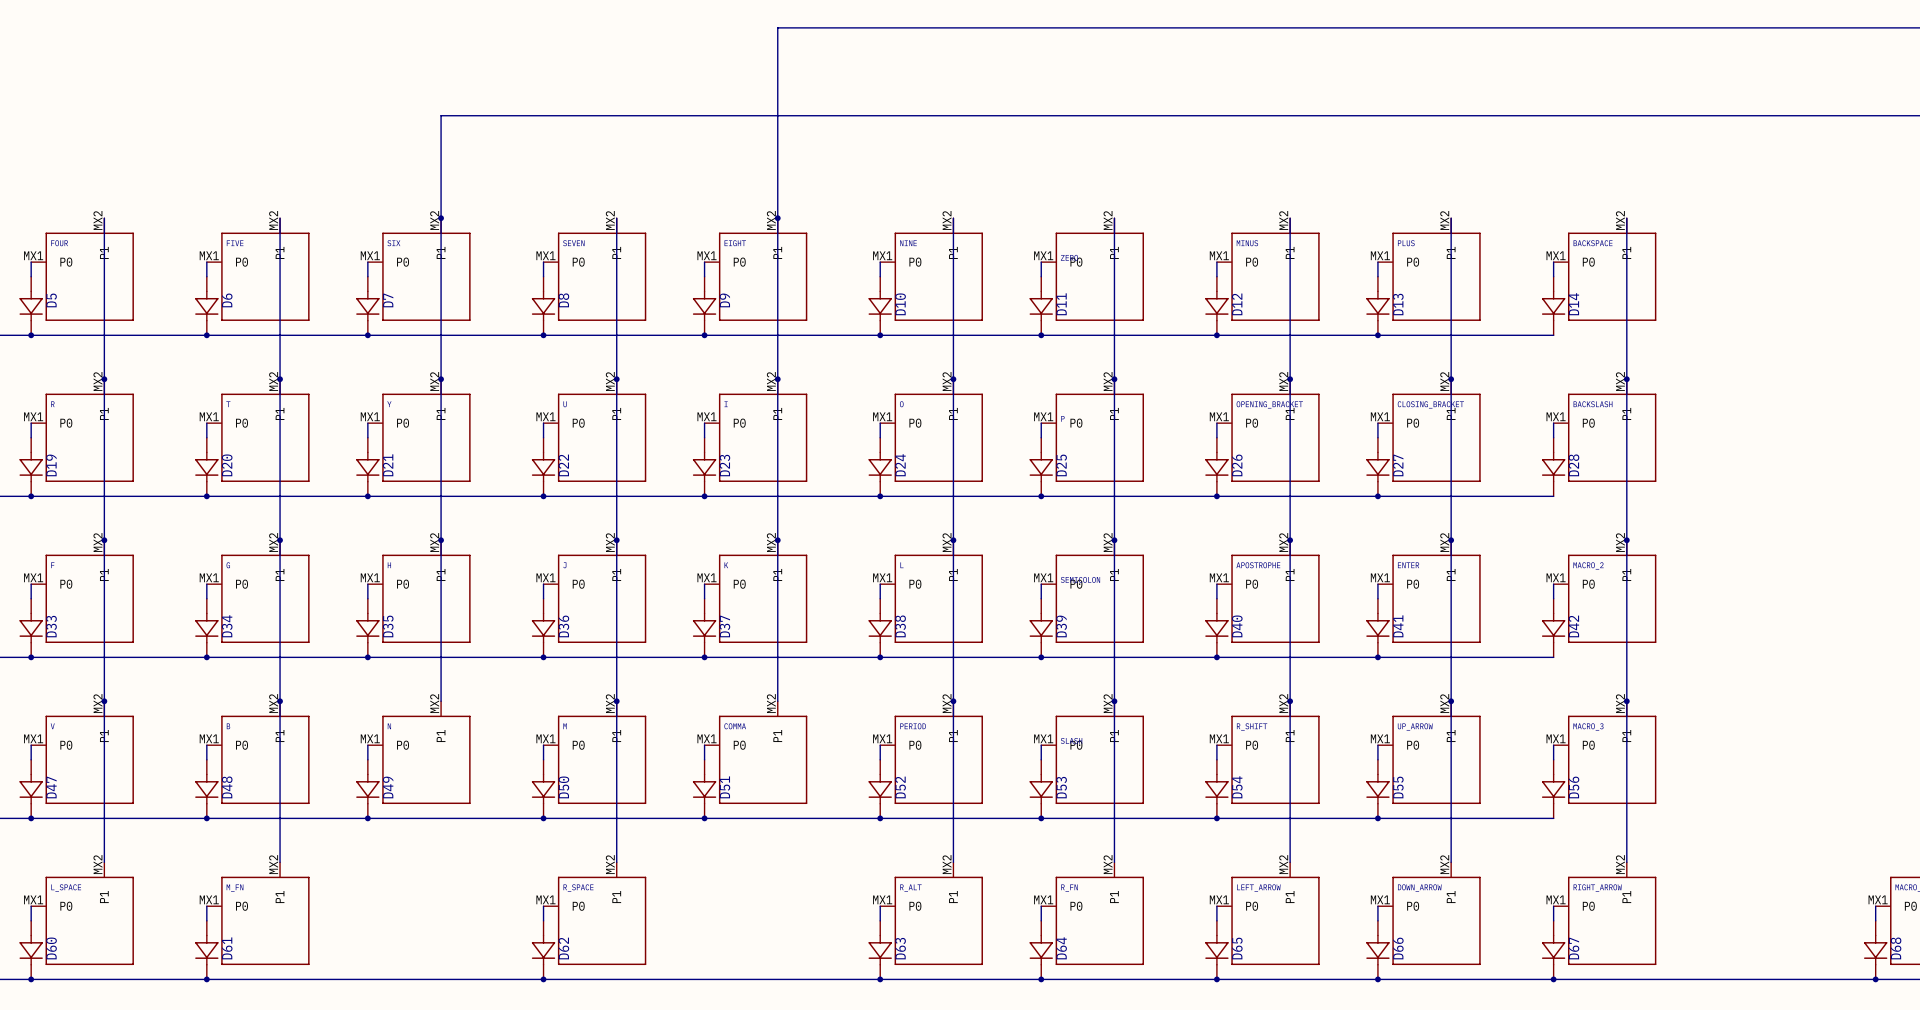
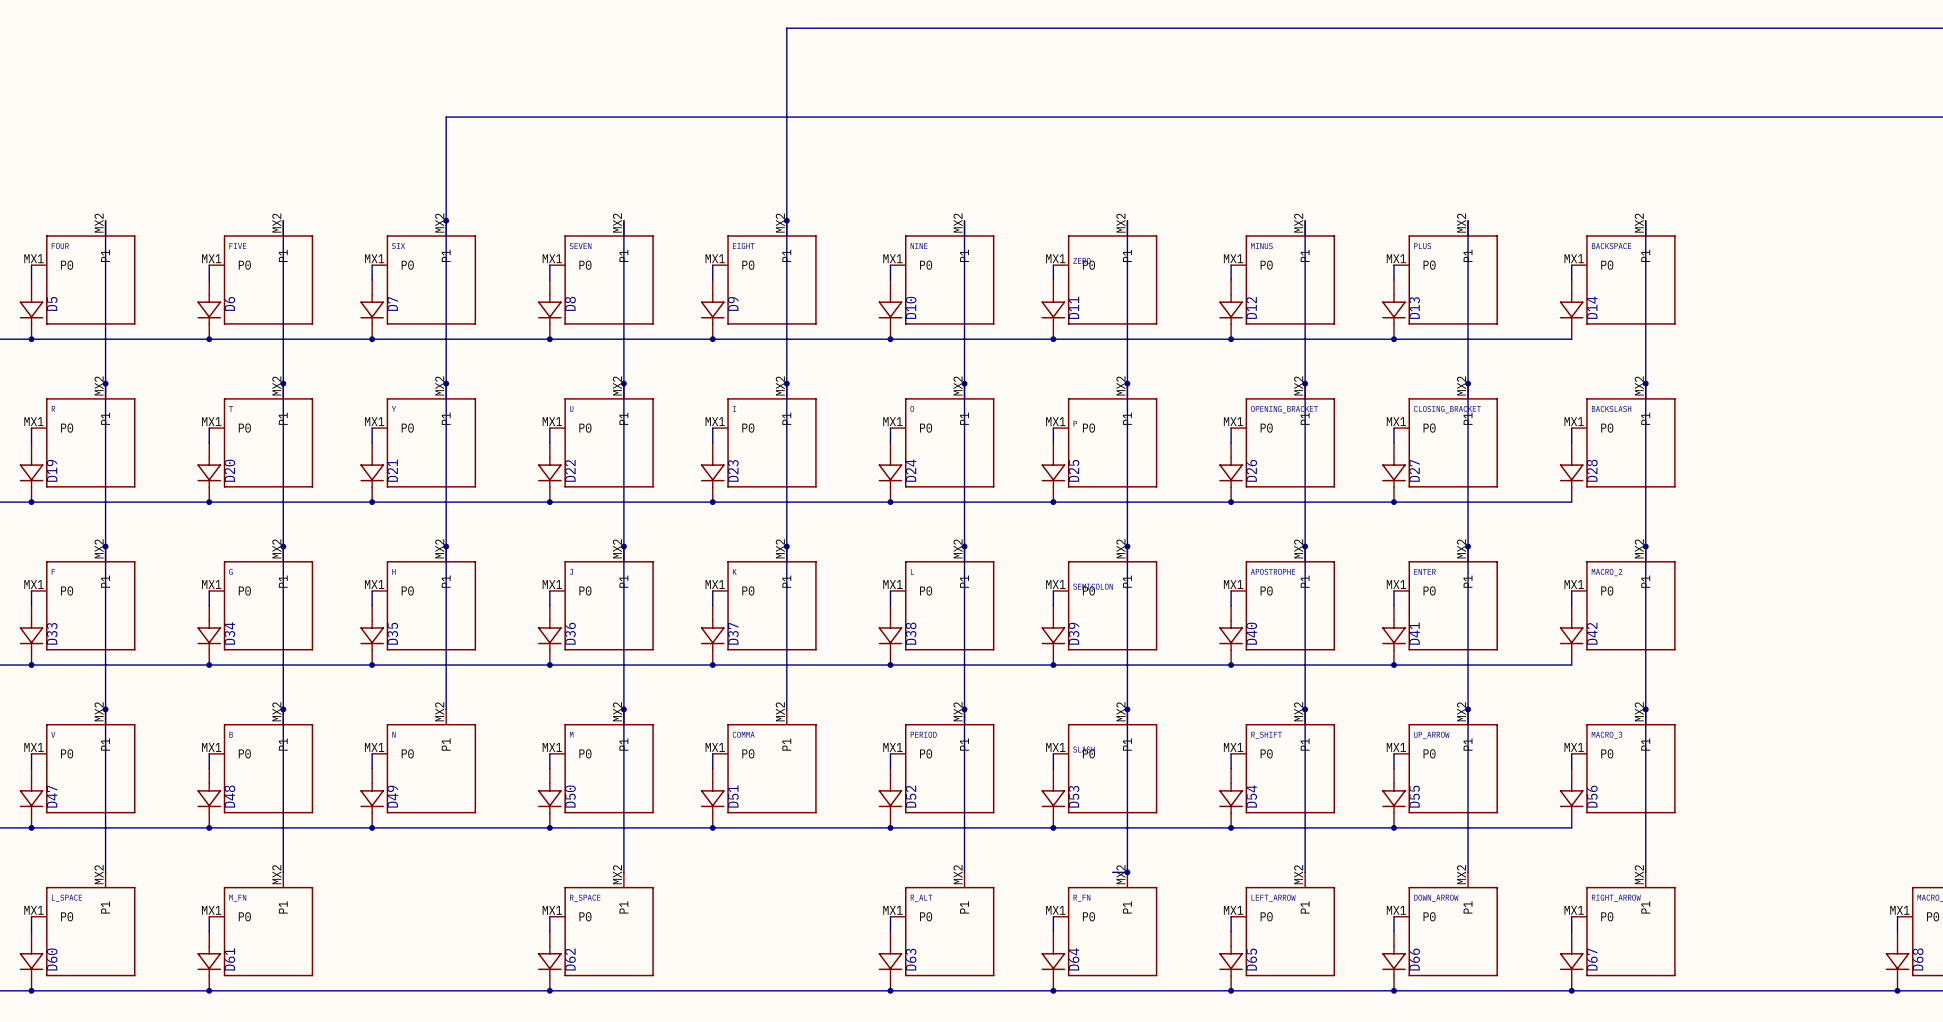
wire: none -> (1112, 872) (1127, 872)
junction: none -> (1127, 872)

